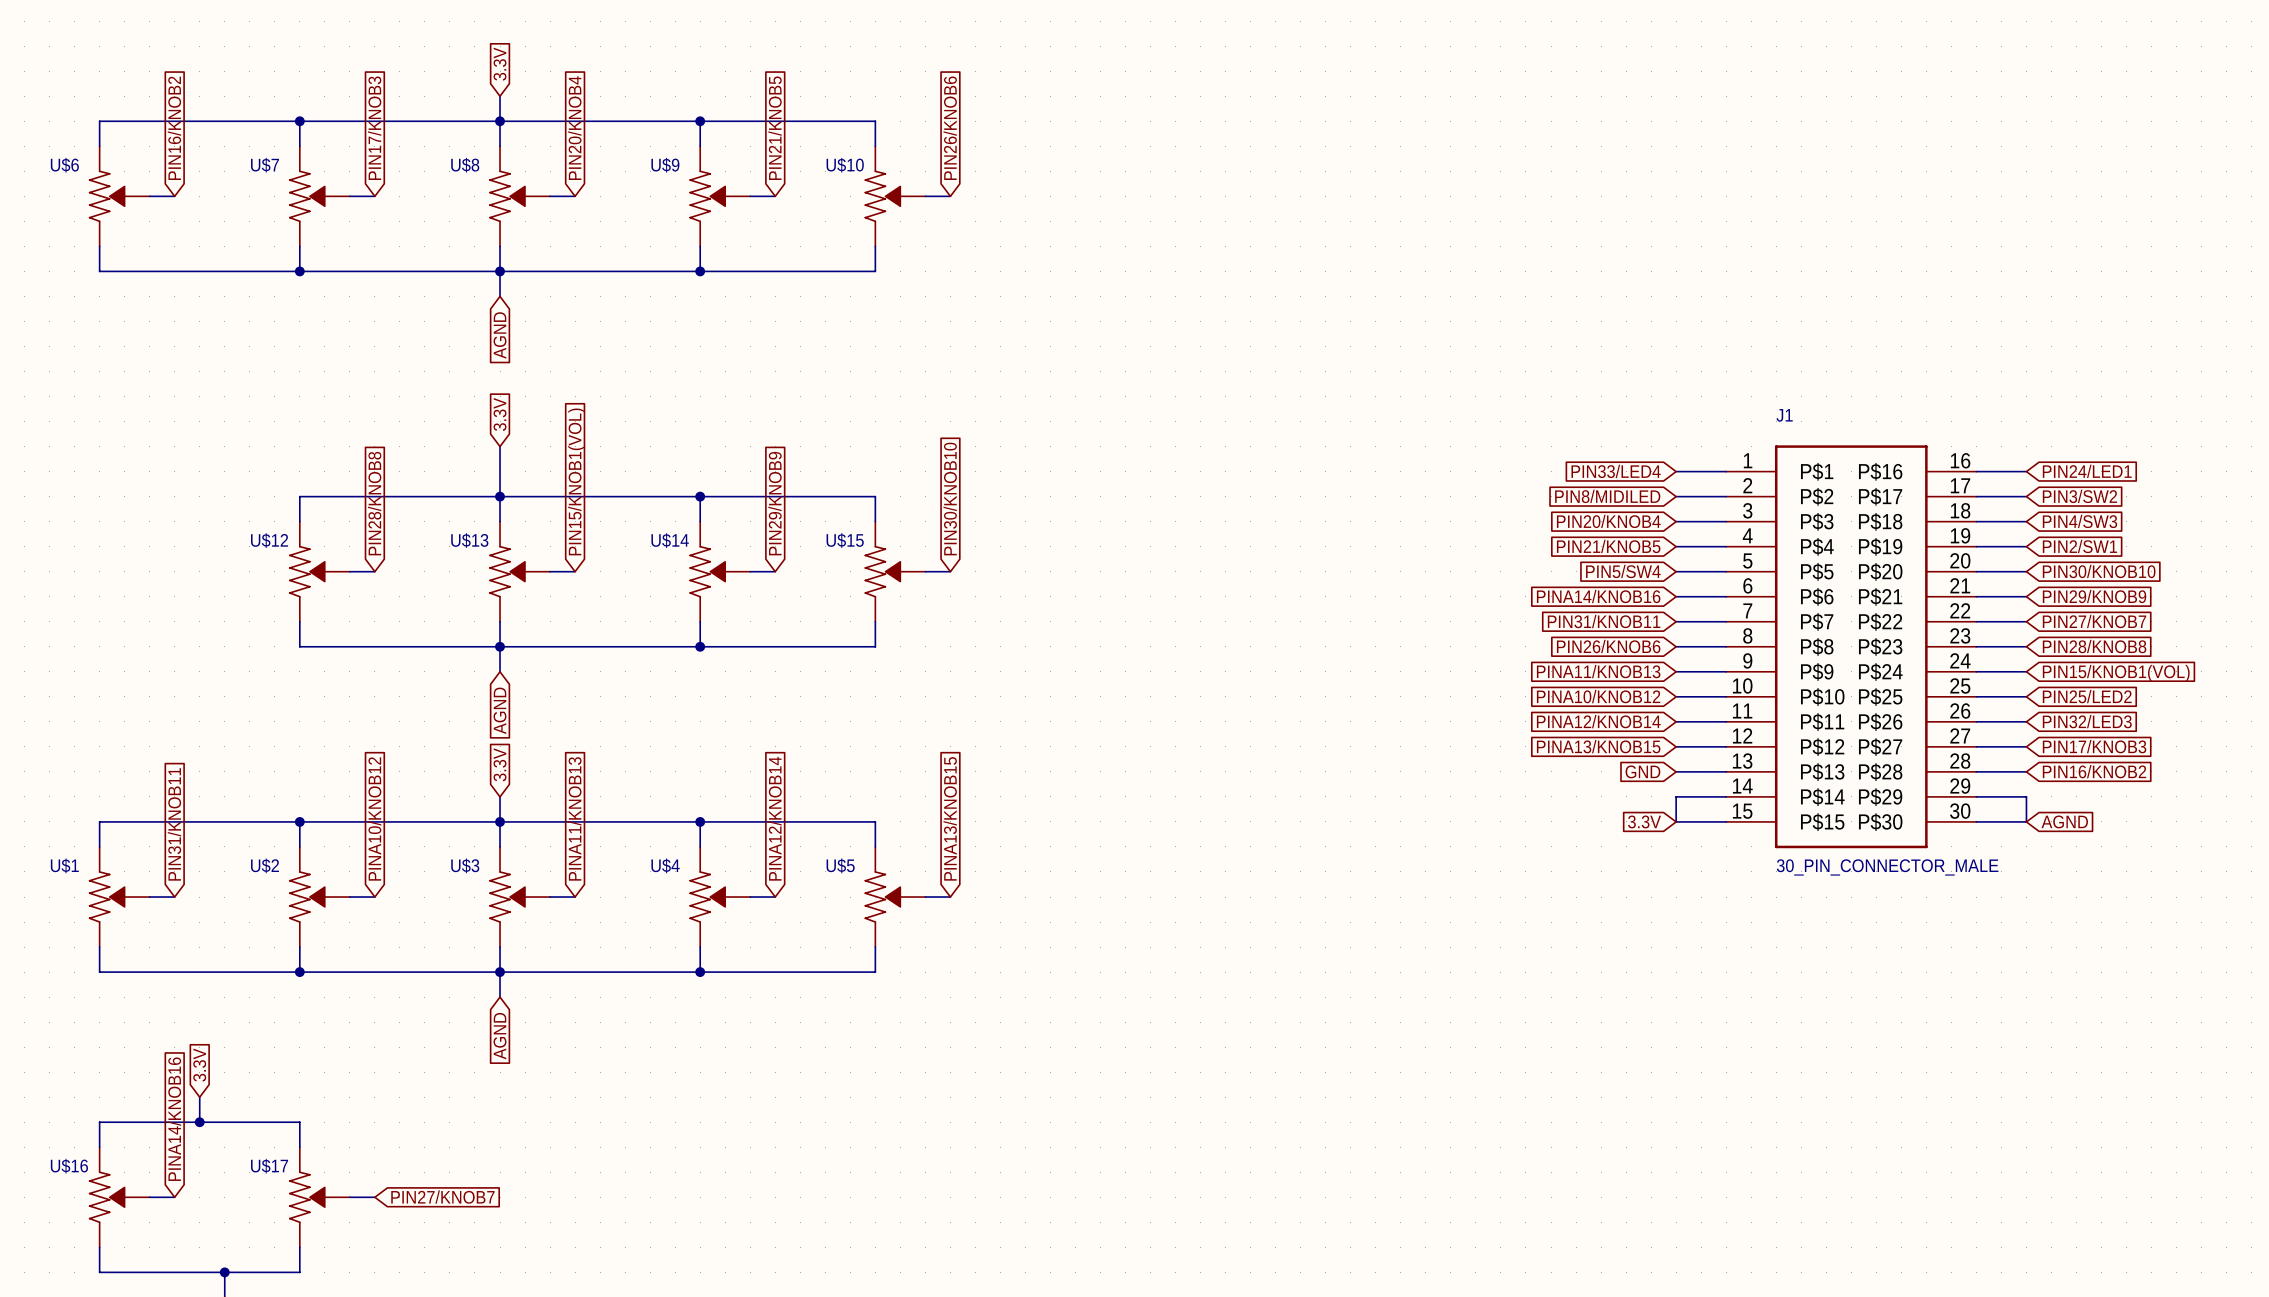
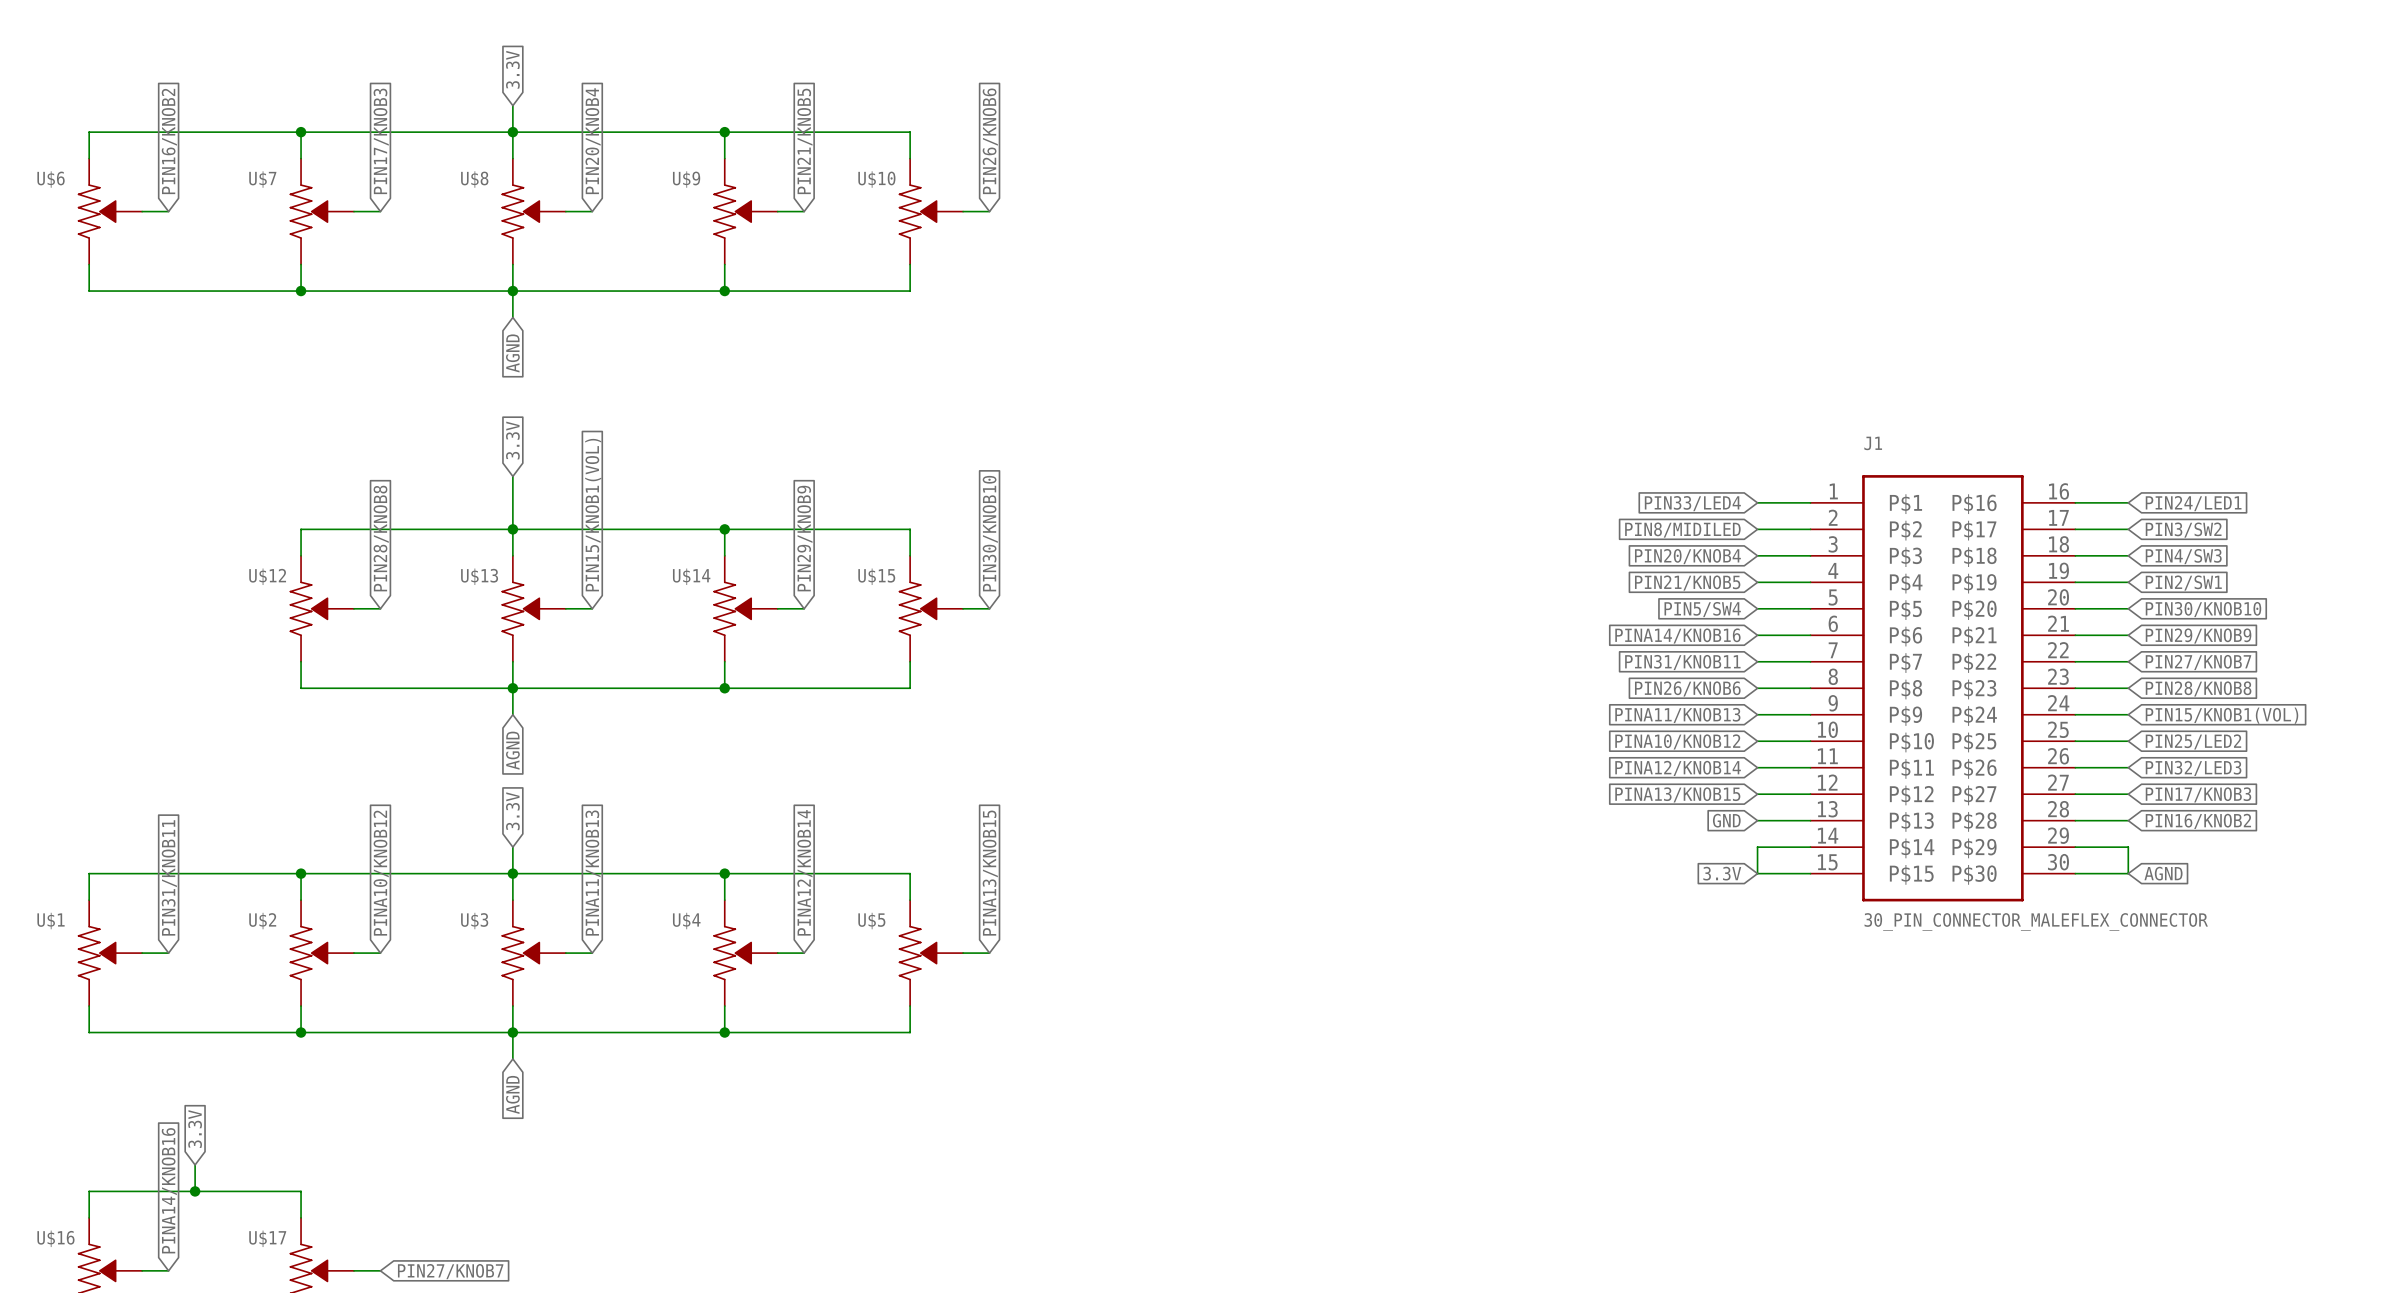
J1 value: 30_PIN_CONNECTOR_MALE (1887, 867) -> 30_PIN_CONNECTOR_MALEFLEX_CONNECTOR (2036, 922)

